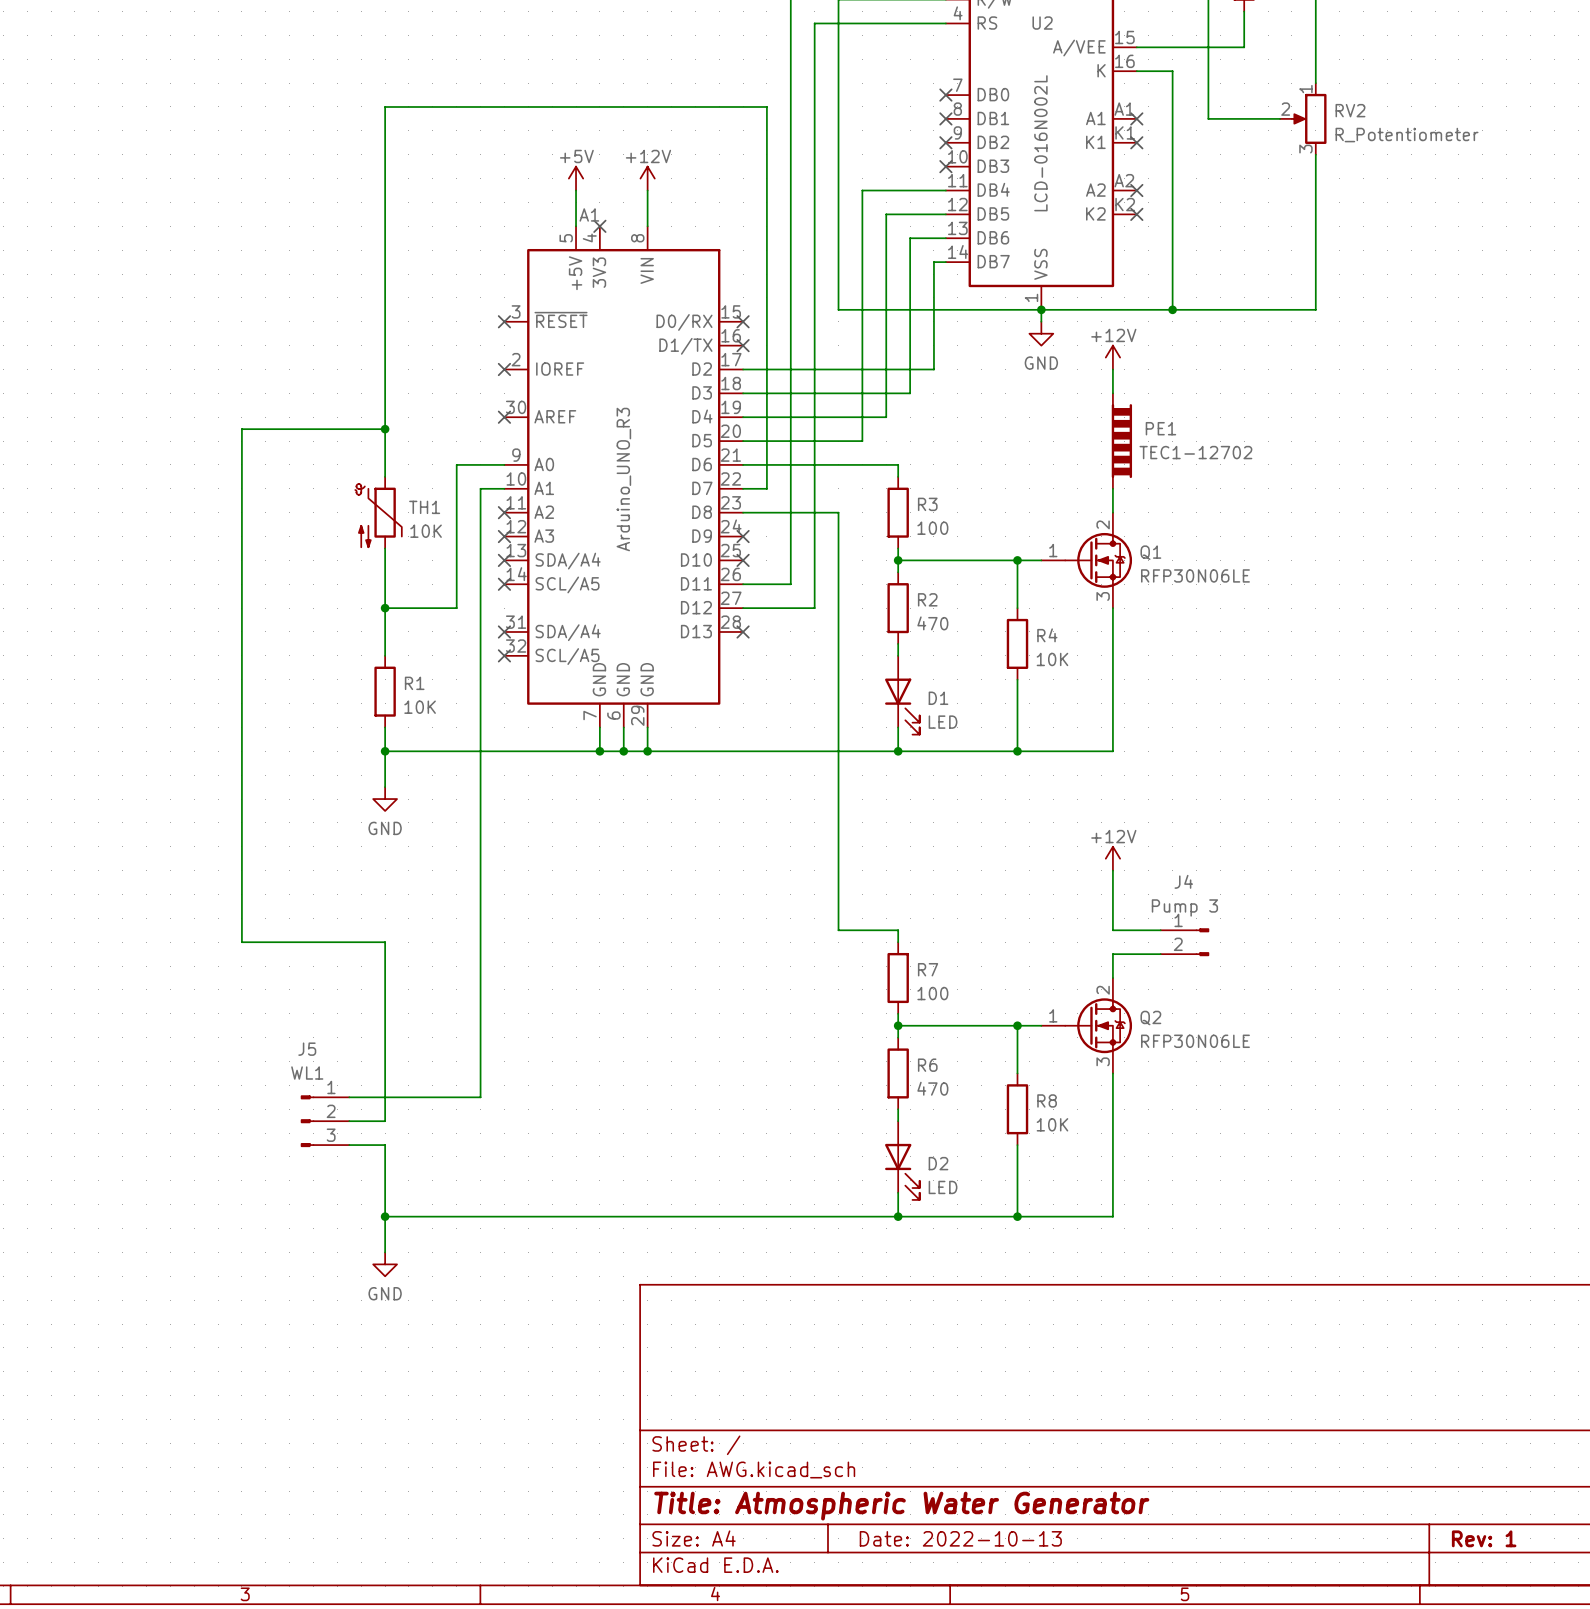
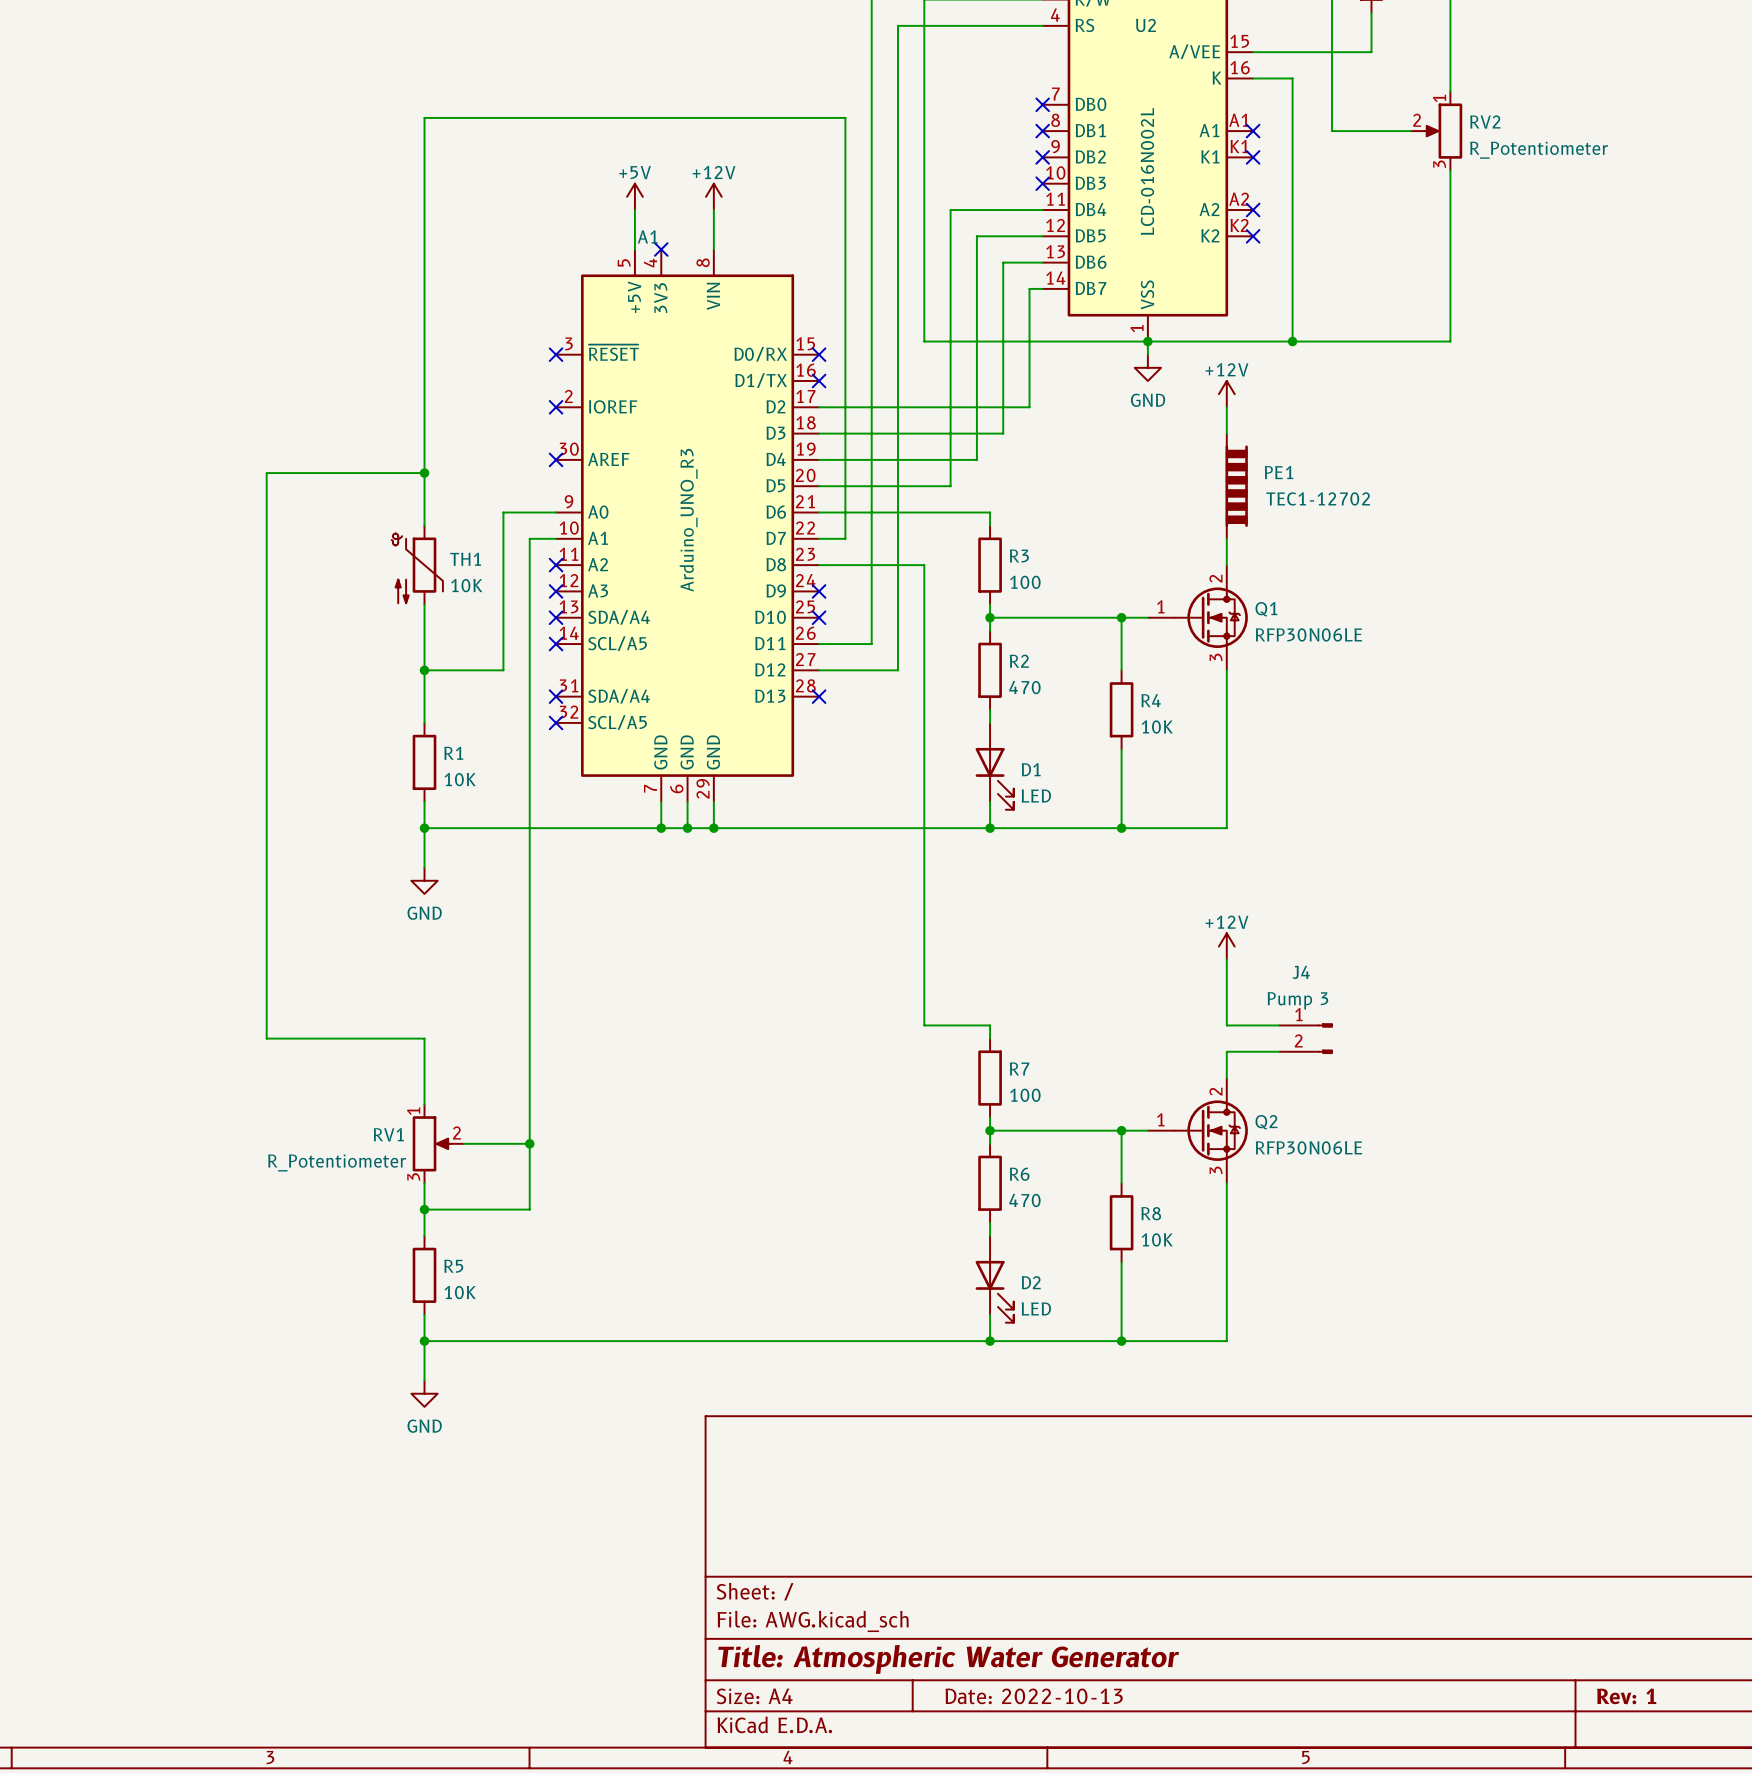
wire: (385, 1001) (385, 1073) -> none
RV1: none -> R_Potentiometer (438, 1143)
wire: none -> (463, 1143) (529, 1143)
junction: none -> (529, 1143)
wire: (349, 1097) (385, 1097) -> none
junction: none -> (424, 1209)
J5: WL1 (325, 1121) -> none
wire: (349, 1121) (385, 1121) -> none
wire: (349, 1145) (385, 1145) (385, 1192) -> none
R5: none -> 10K (424, 1275)

